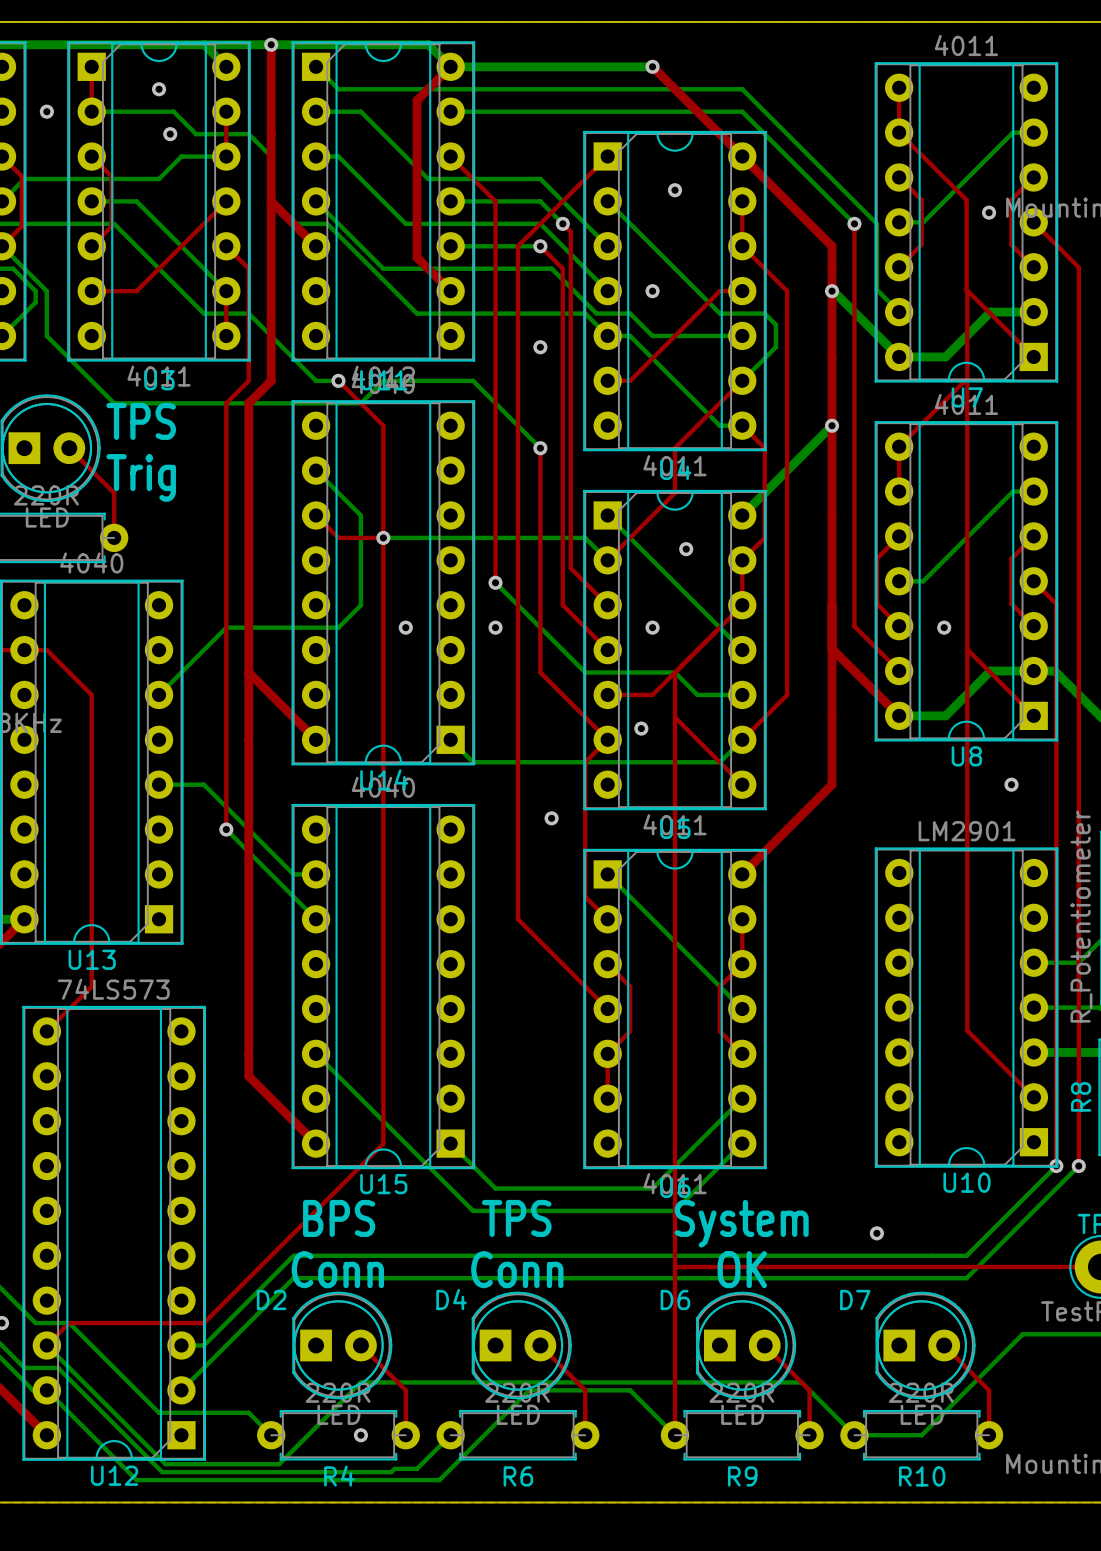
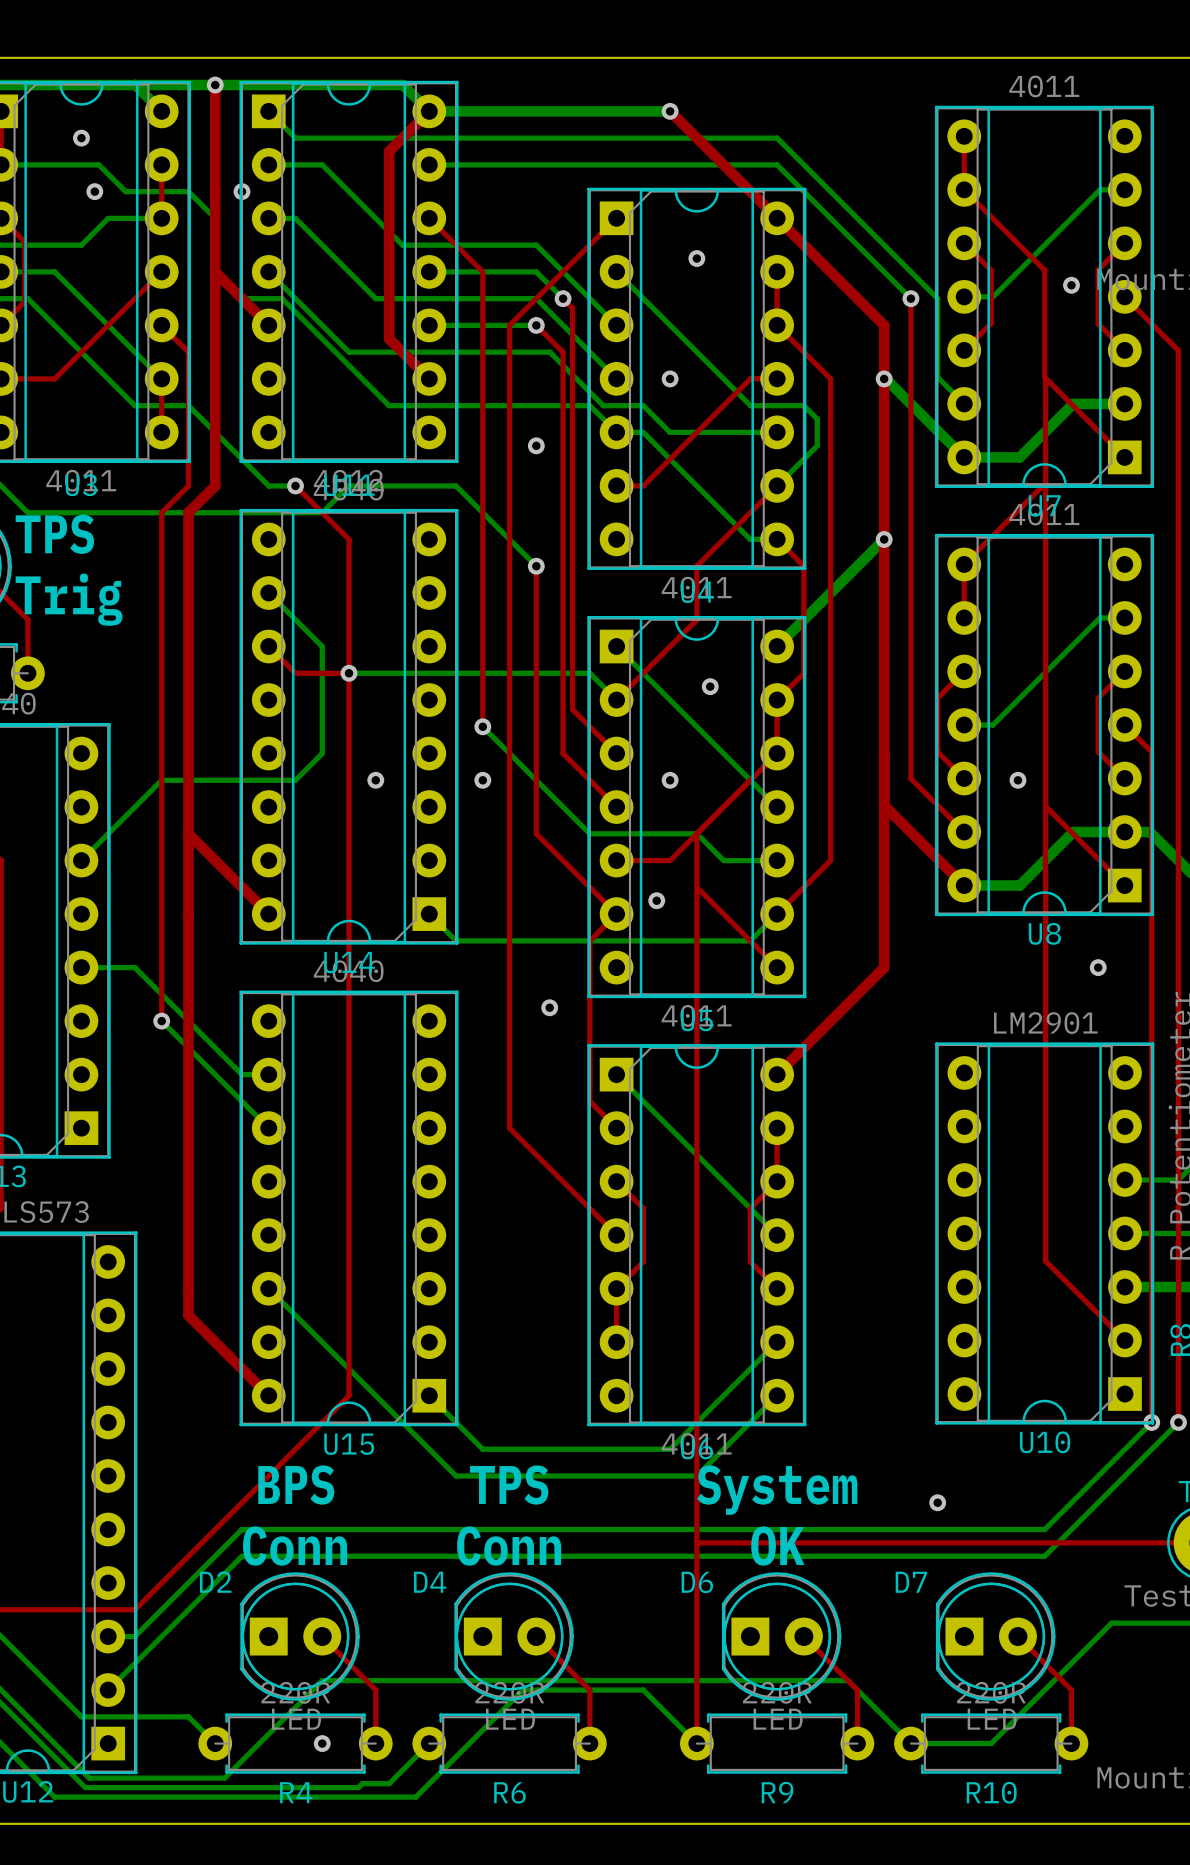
via: none -> (241, 191)

